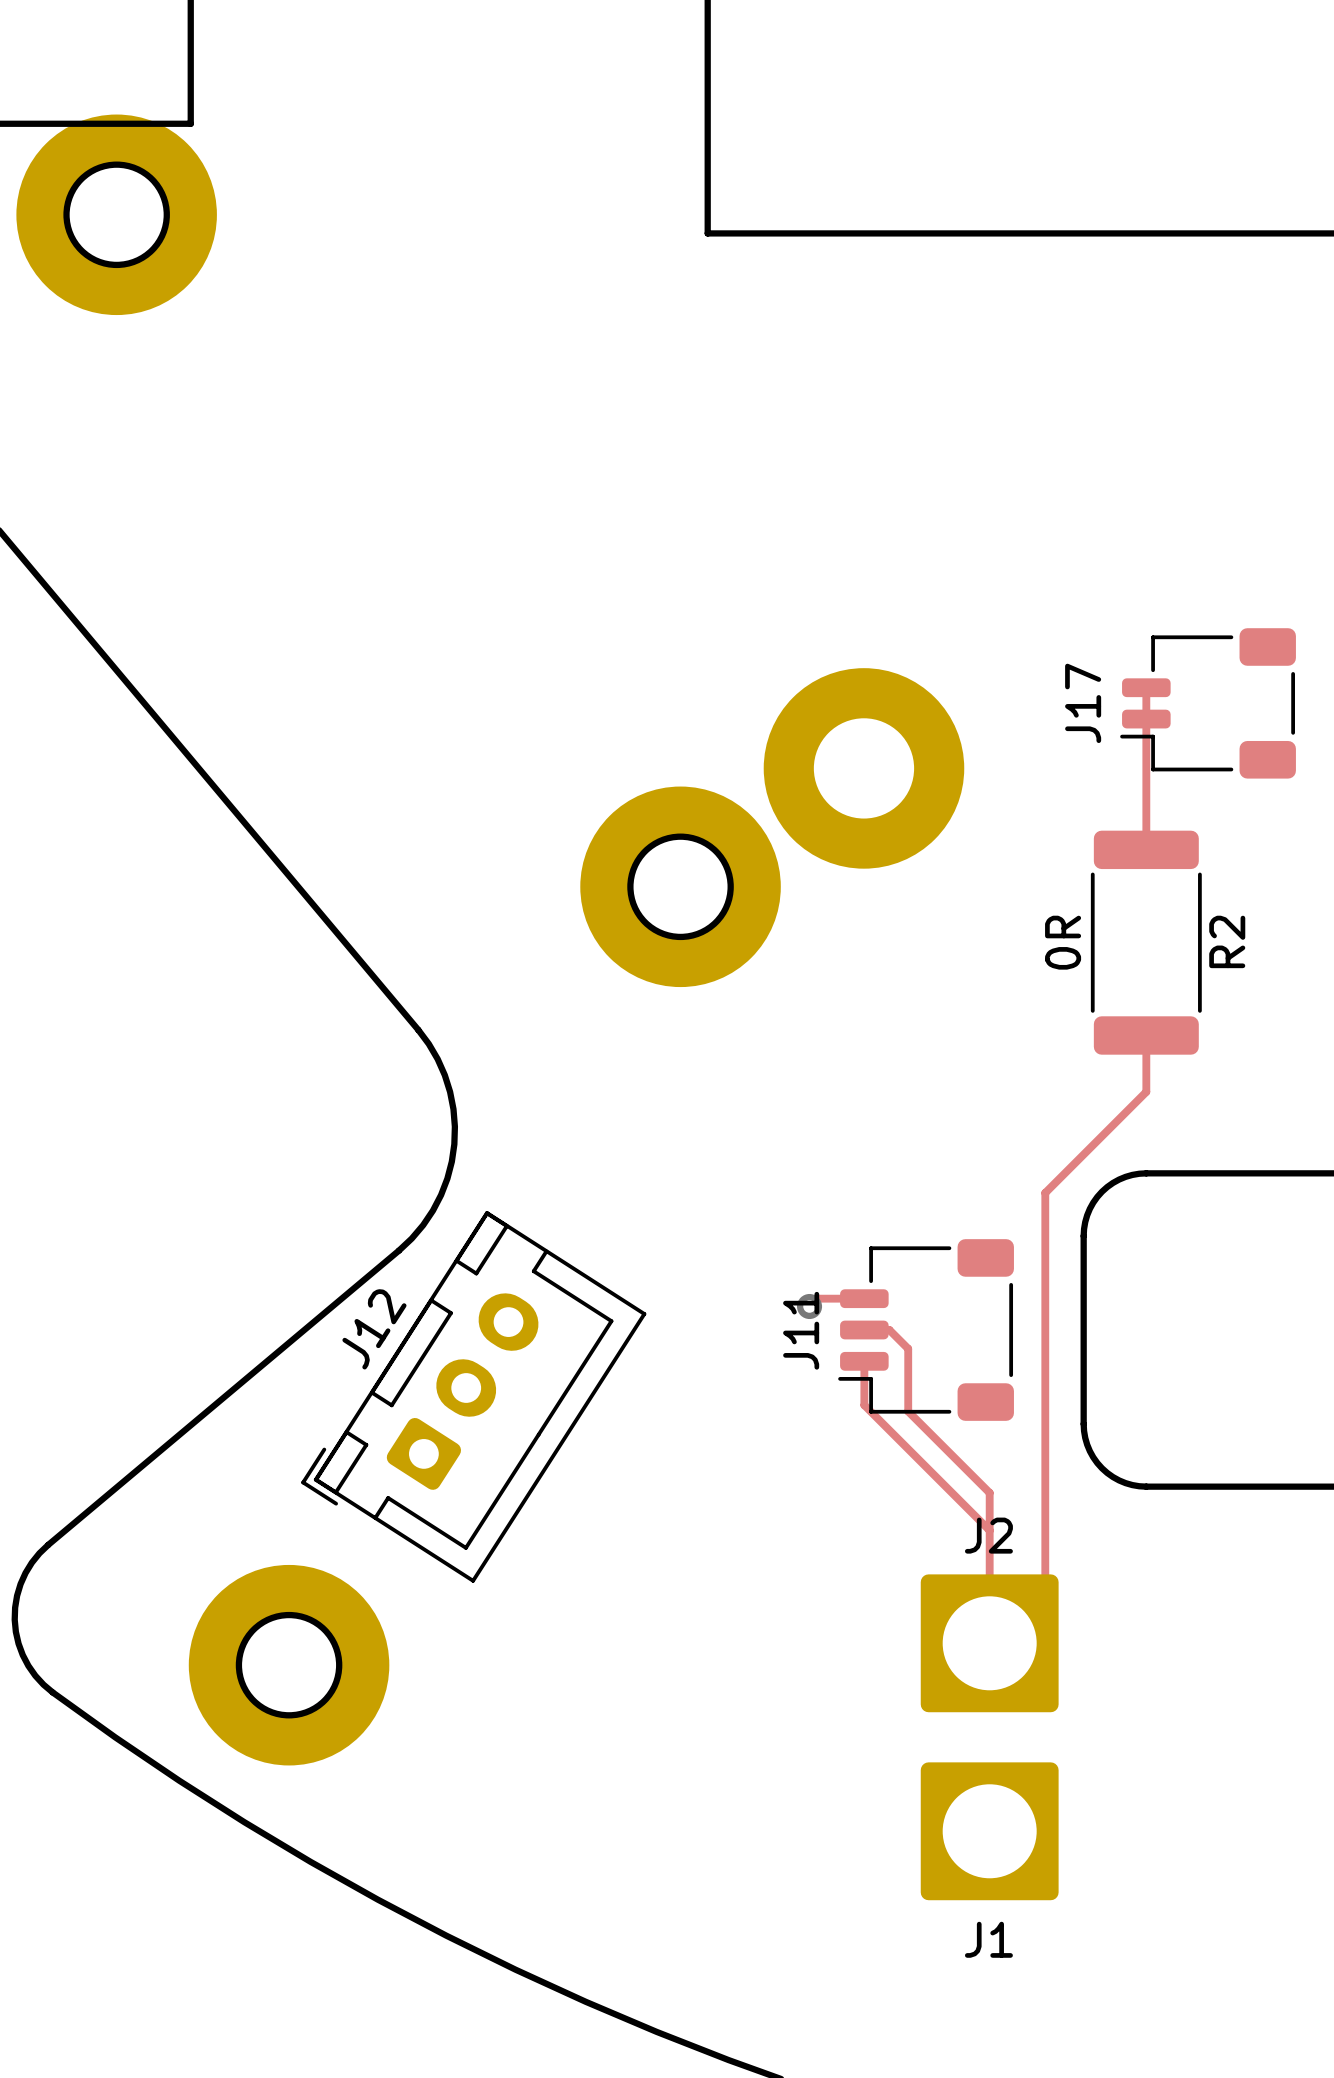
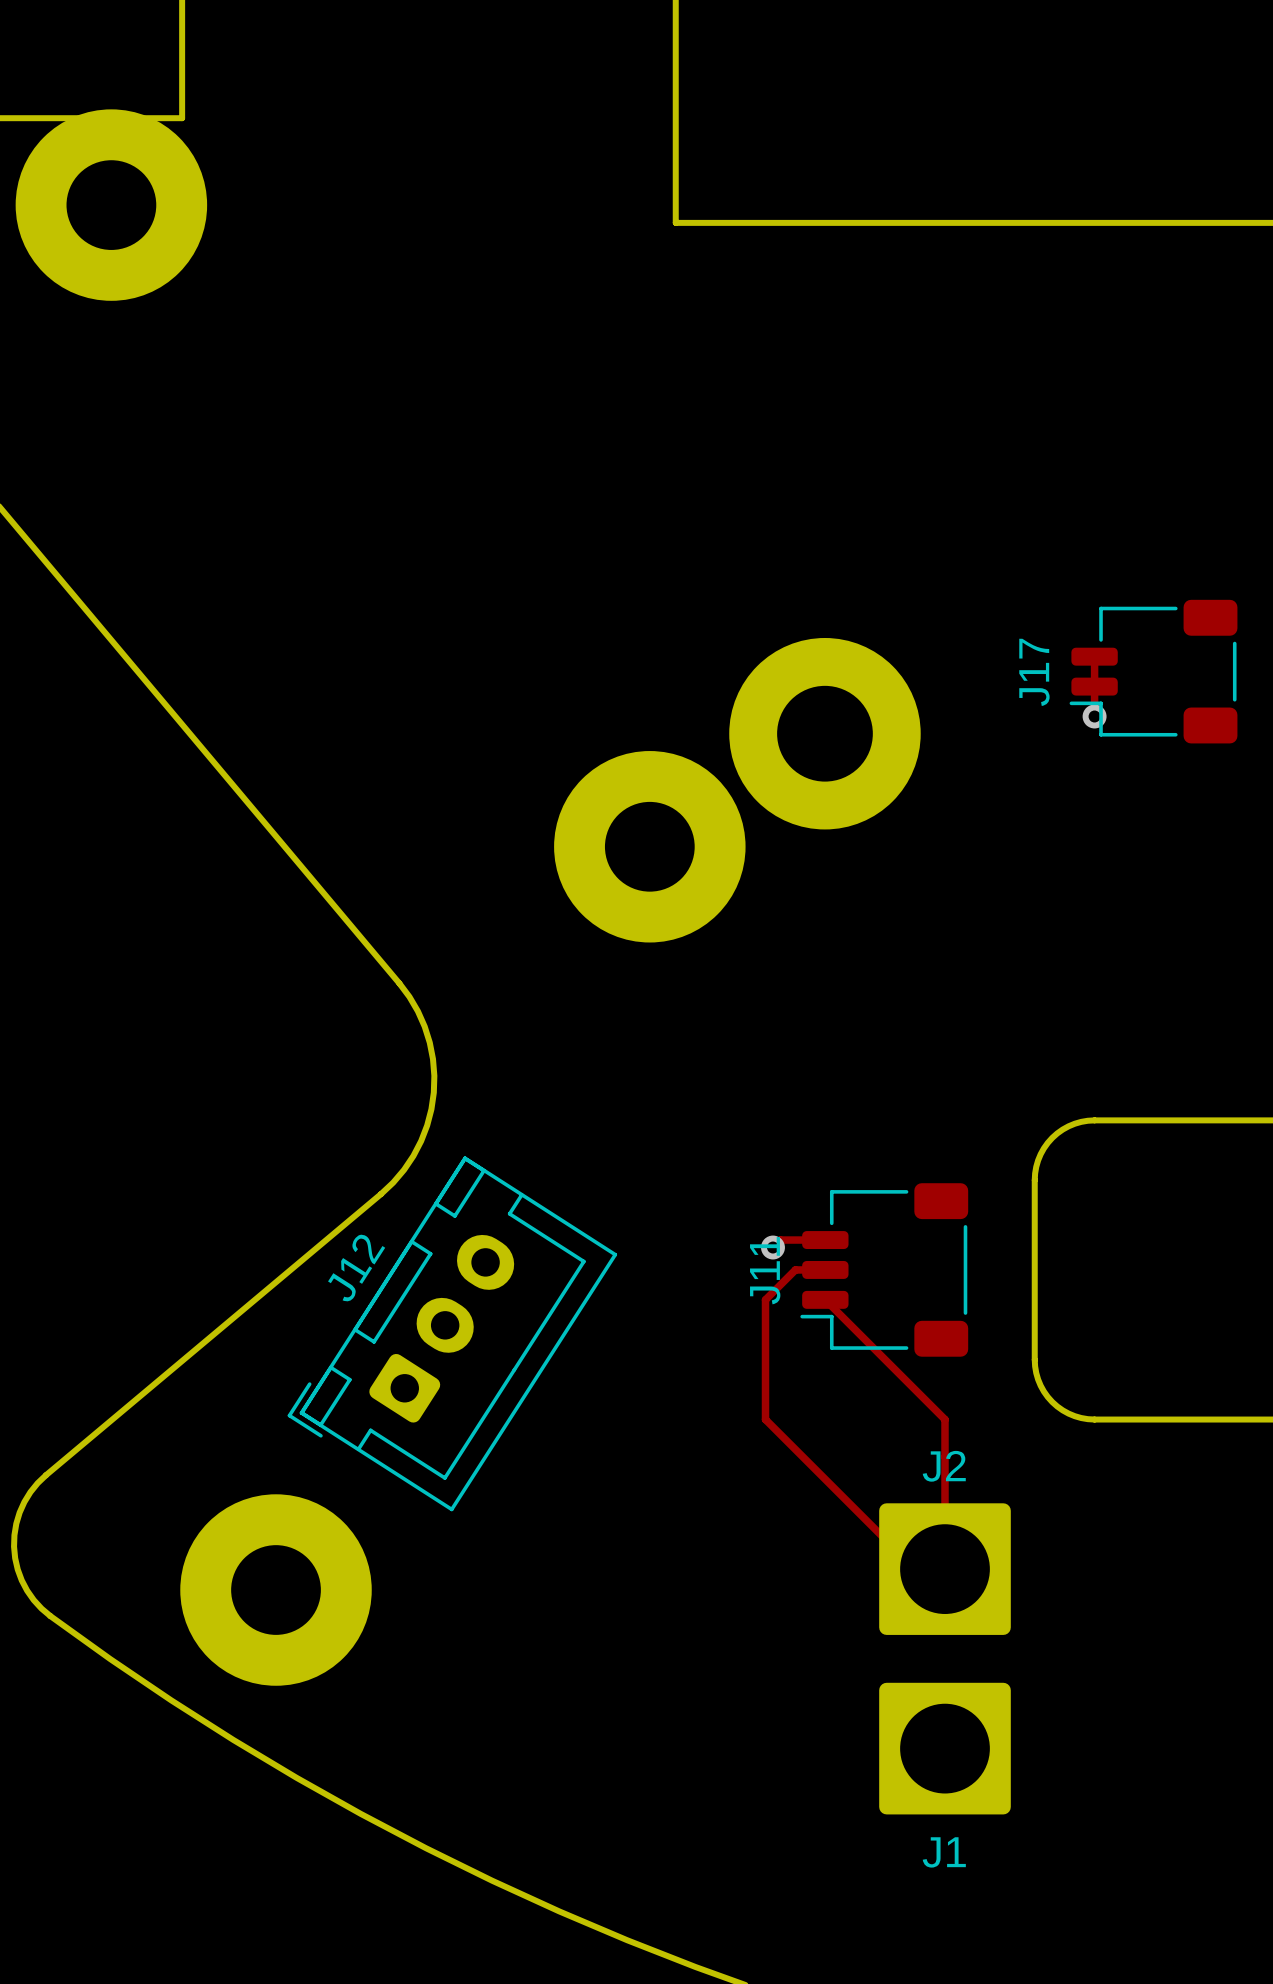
track: (1146, 750) (1146, 849) -> none
via: none -> (1094, 716)
R2: 0R (1146, 942) -> none
track: (1146, 1035) (1146, 1091) (1045, 1192) (1045, 1587) (989, 1643) -> (825, 1269) (795, 1269) (765, 1299) (765, 1419) (915, 1569) (945, 1569)
track: (864, 1330) (889, 1330) (908, 1348) (908, 1411) (989, 1492) -> (825, 1299) (945, 1419) (945, 1425)
track: (864, 1361) (864, 1405) (989, 1530) -> none

